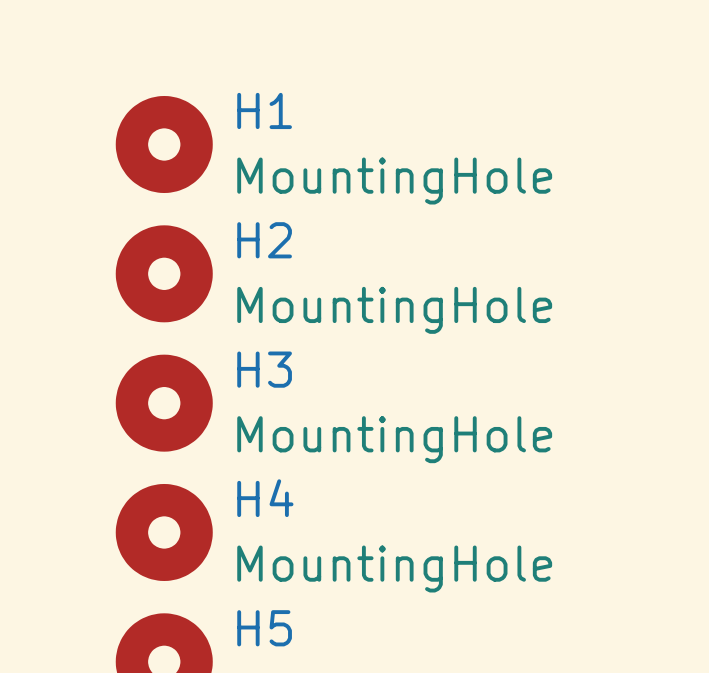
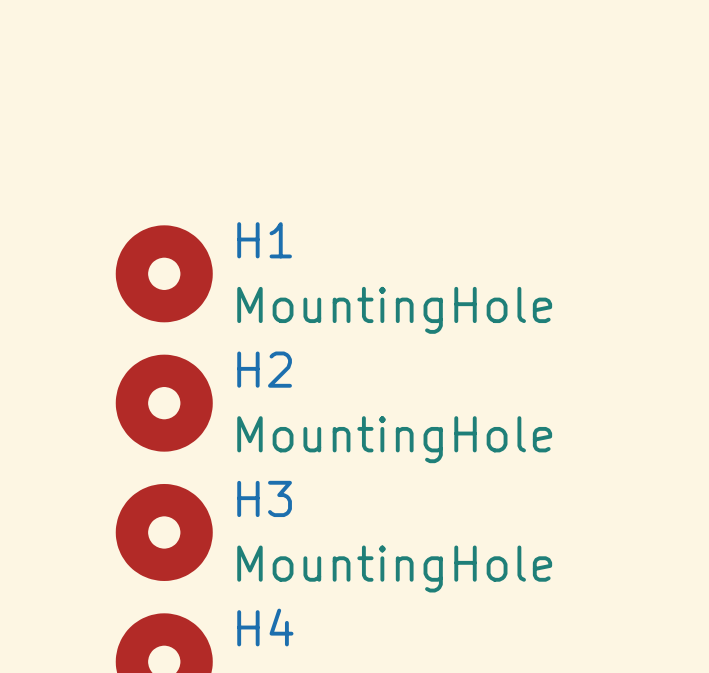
H1: MountingHole (164, 144) -> none
H2 name: H2 (264, 240) -> H1 (264, 240)
H3 name: H3 (264, 369) -> H2 (264, 369)
H4 name: H4 (265, 498) -> H3 (264, 498)
H5 name: H5 (264, 628) -> H4 (265, 627)

